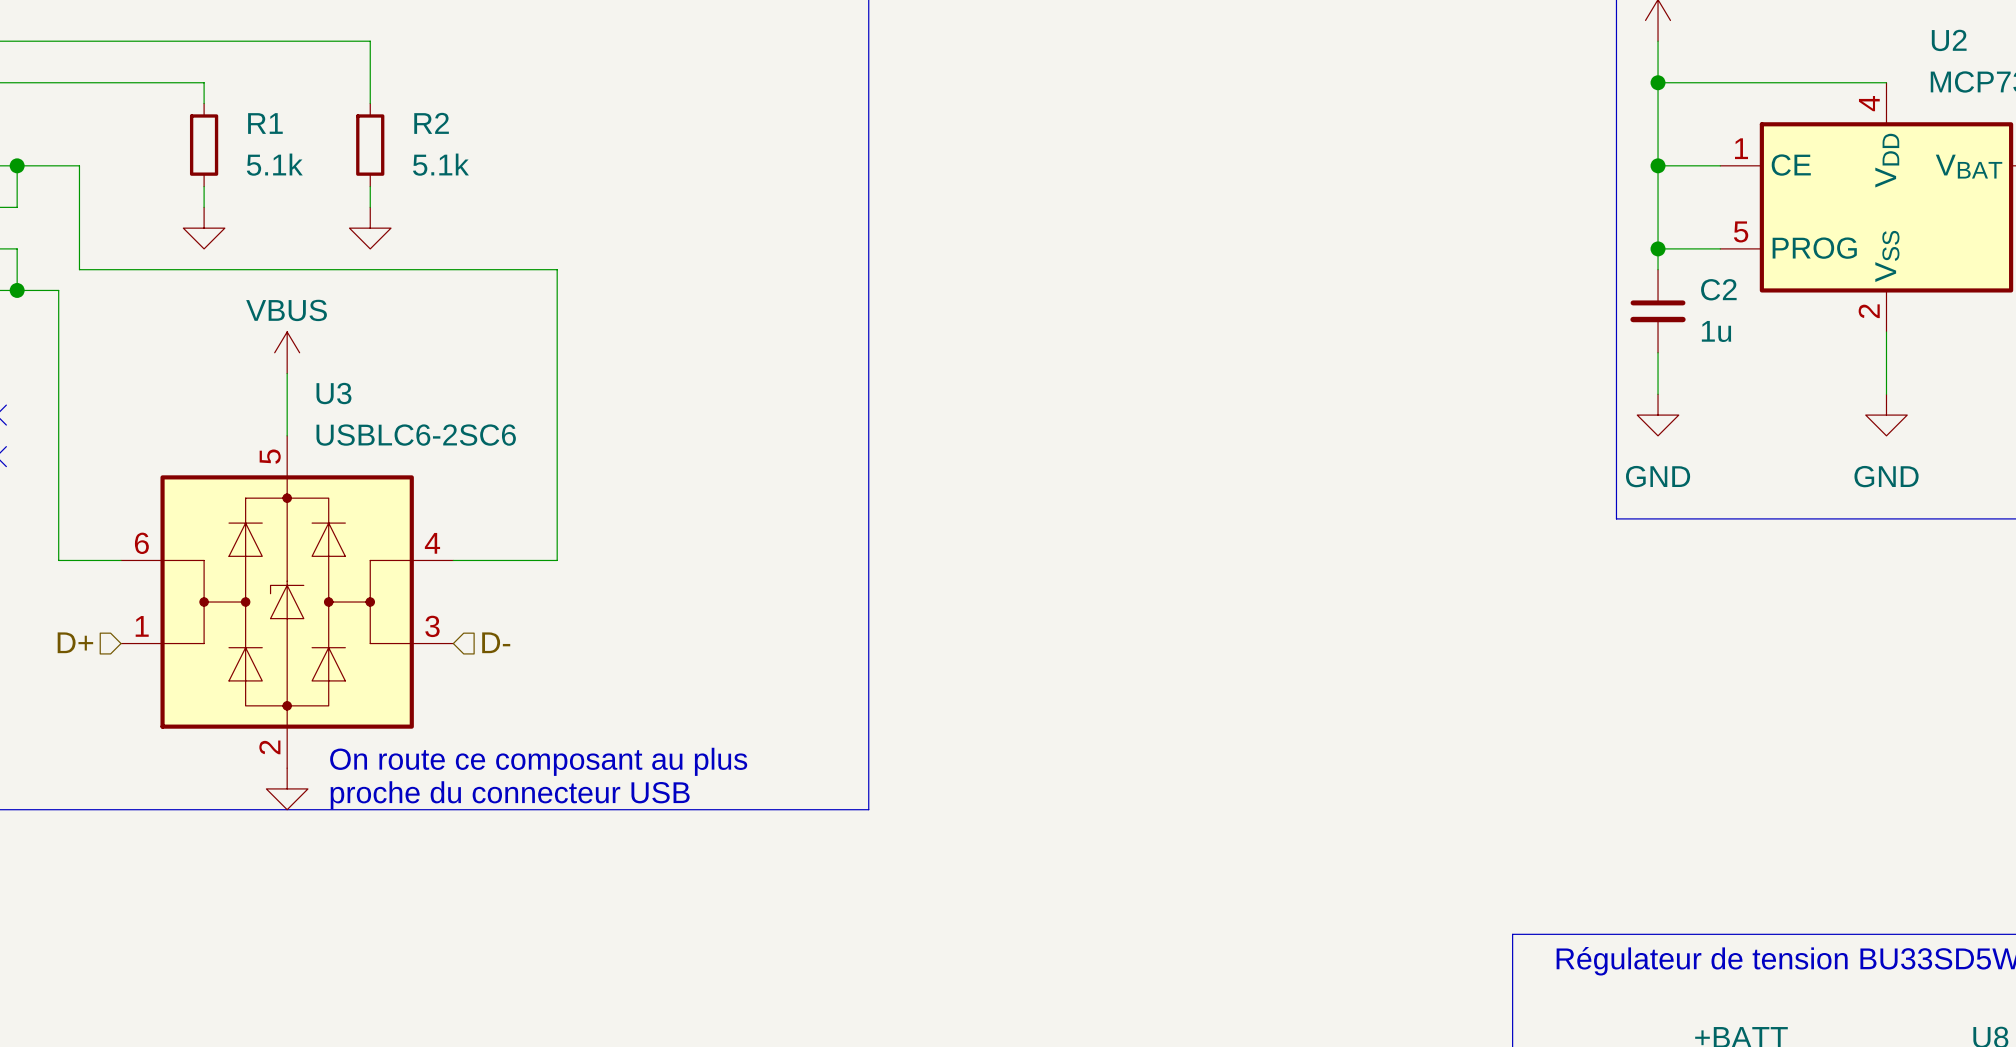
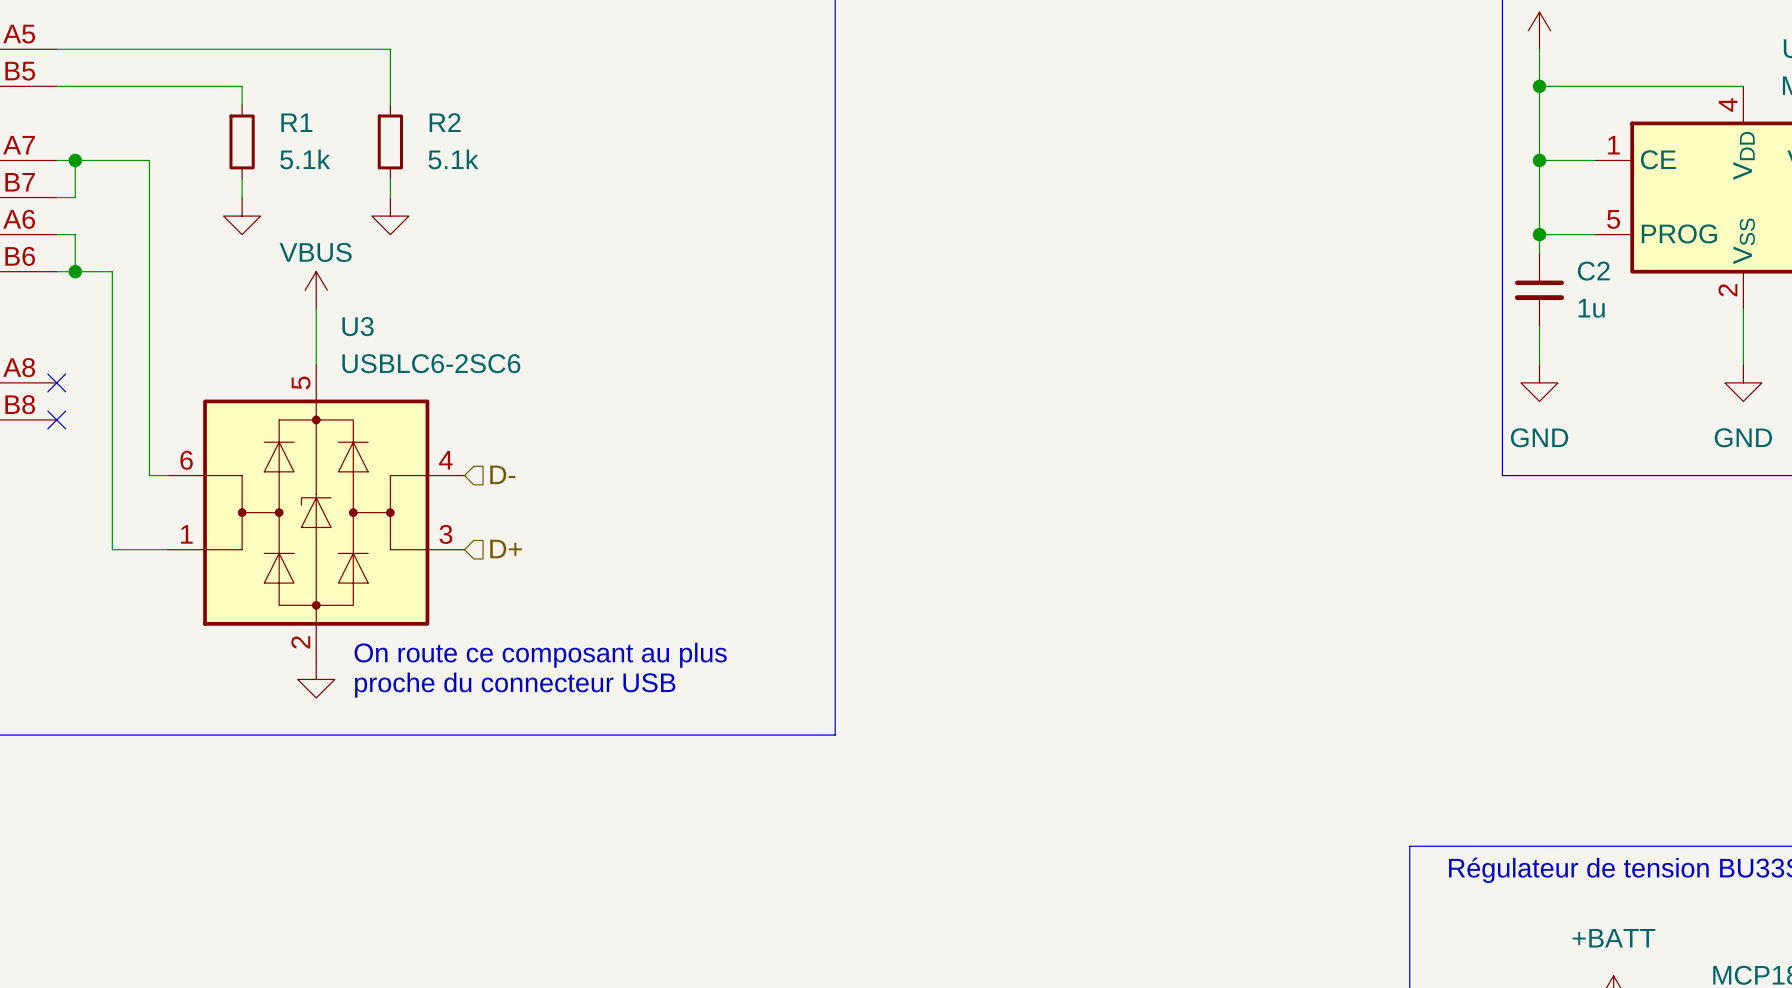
wire: (79, 165) (79, 269) (557, 269) (557, 560) (453, 560) -> (130, 160) (149, 160) (149, 475) (167, 475)
power symbol position: VBUS (287, 352) -> VBUS (316, 290)
wire: (58, 560) (121, 560) -> (112, 512) (112, 549) (167, 549)
U3 position: (287, 602) -> (316, 512)
hierarchical label rotation: 0° (75, 642) -> 180° (506, 549)
hierarchical label position: D+ (75, 642) -> D+ (506, 549)
hierarchical label position: D- (496, 642) -> D- (502, 474)
text: none -> On route ce composant au plus (540, 655)
text: On route ce composant au plus (538, 761) -> proche du connecteur USB (515, 685)
power symbol position: (287, 788) -> (316, 679)
text: proche du connecteur USB (510, 795) -> none

